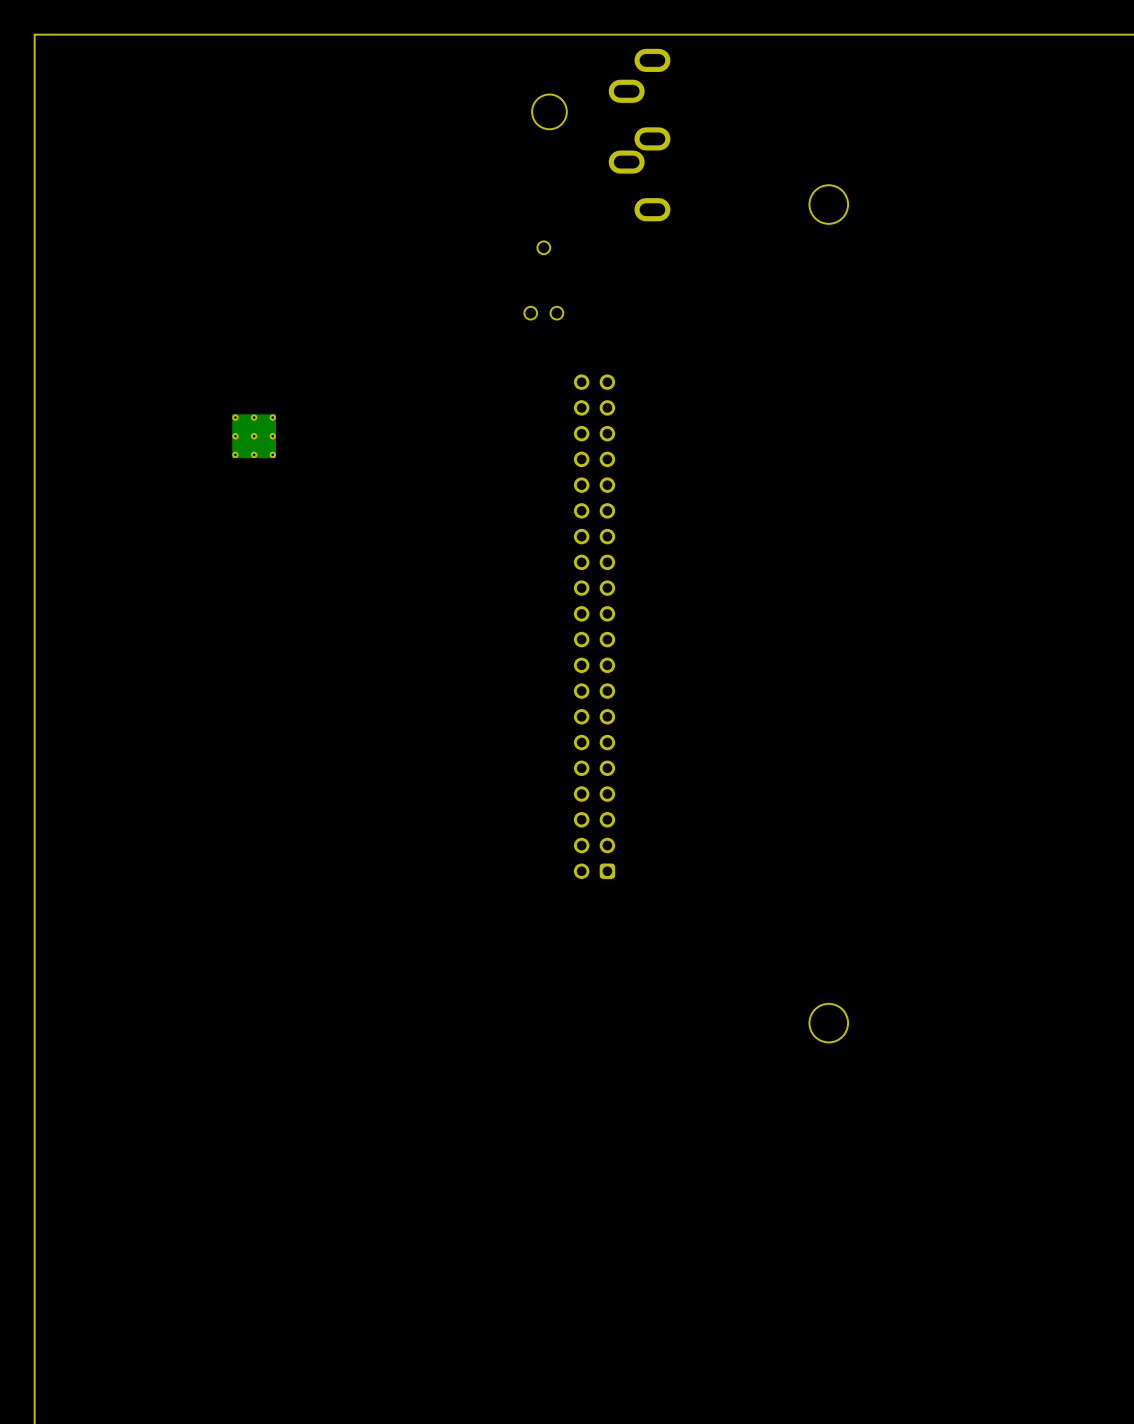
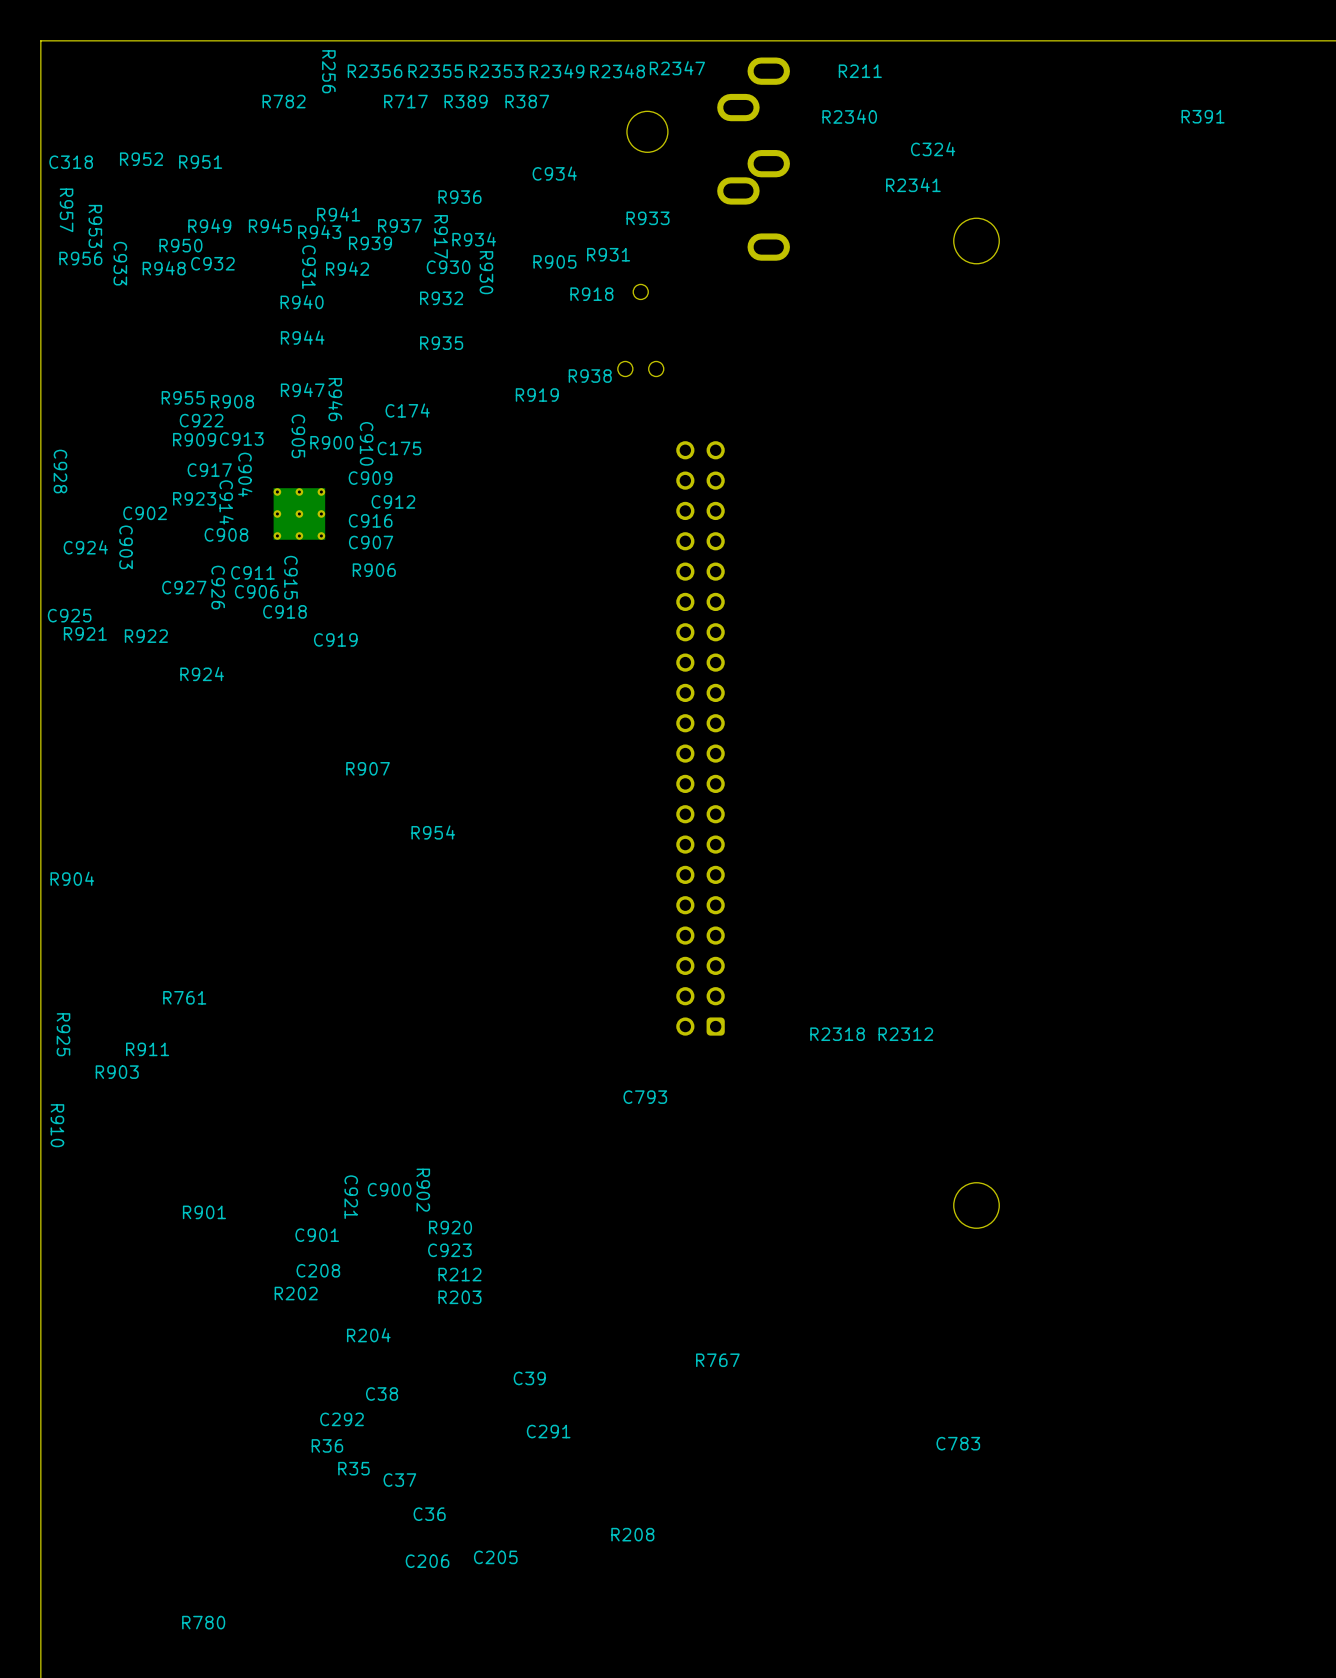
R2347: none -> (677, 68)
R256: none -> (328, 71)
R2356: none -> (375, 71)
R2355: none -> (435, 71)
R2353: none -> (496, 71)
R2349: none -> (557, 71)
R2348: none -> (617, 71)
R211: none -> (860, 71)
R782: none -> (284, 101)
R717: none -> (405, 101)
R389: none -> (466, 101)
R387: none -> (527, 101)
R2340: none -> (849, 116)
R391: none -> (1203, 116)
C324: none -> (933, 149)
R952: none -> (141, 159)
C318: none -> (71, 162)
R951: none -> (200, 162)
C934: none -> (554, 173)
R2341: none -> (913, 185)
R936: none -> (459, 197)
R957: none -> (66, 210)
R941: none -> (338, 214)
R933: none -> (648, 218)
R949: none -> (209, 225)
R945: none -> (270, 225)
R937: none -> (399, 225)
R953: none -> (95, 226)
R943: none -> (319, 231)
R917: none -> (441, 236)
R934: none -> (474, 239)
R939: none -> (370, 243)
R950: none -> (180, 245)
R931: none -> (608, 254)
R956: none -> (80, 258)
R905: none -> (554, 261)
C933: none -> (120, 263)
C932: none -> (212, 263)
C931: none -> (308, 267)
C930: none -> (448, 267)
R948: none -> (164, 268)
R942: none -> (347, 268)
R930: none -> (486, 272)
R918: none -> (591, 294)
R932: none -> (441, 298)
R940: none -> (302, 302)
R944: none -> (302, 337)
R935: none -> (441, 343)
R938: none -> (590, 376)
R947: none -> (302, 390)
R919: none -> (537, 395)
R955: none -> (183, 397)
R946: none -> (335, 399)
R908: none -> (232, 401)
C174: none -> (407, 410)
C922: none -> (201, 420)
C905: none -> (298, 436)
C913: none -> (241, 438)
R909: none -> (194, 439)
R900: none -> (331, 442)
C910: none -> (366, 443)
C175: none -> (399, 448)
C917: none -> (209, 470)
C928: none -> (60, 471)
C904: none -> (245, 474)
C909: none -> (370, 478)
R923: none -> (194, 498)
C912: none -> (393, 501)
C914: none -> (226, 502)
C902: none -> (145, 513)
C916: none -> (370, 520)
C908: none -> (226, 534)
C907: none -> (371, 542)
C924: none -> (85, 547)
C903: none -> (126, 547)
R906: none -> (374, 570)
C911: none -> (252, 572)
C915: none -> (290, 577)
C927: none -> (184, 587)
C926: none -> (218, 587)
C906: none -> (256, 591)
C918: none -> (284, 611)
C925: none -> (69, 615)
R921: none -> (85, 633)
R922: none -> (146, 636)
C919: none -> (335, 639)
R924: none -> (202, 674)
R907: none -> (368, 768)
R954: none -> (433, 832)
R904: none -> (72, 878)
R761: none -> (184, 997)
R2318: none -> (837, 1034)
R2312: none -> (905, 1034)
R925: none -> (63, 1034)
R911: none -> (147, 1049)
R903: none -> (117, 1072)
C793: none -> (645, 1097)
R910: none -> (57, 1125)
C900: none -> (389, 1189)
R902: none -> (423, 1190)
C921: none -> (351, 1197)
R901: none -> (204, 1212)
R920: none -> (450, 1227)
C901: none -> (317, 1235)
C923: none -> (449, 1250)
C208: none -> (318, 1270)
R212: none -> (459, 1274)
R202: none -> (296, 1293)
R203: none -> (459, 1297)
R204: none -> (368, 1335)
R767: none -> (717, 1360)
C39: none -> (529, 1378)
C38: none -> (382, 1394)
C292: none -> (342, 1419)
C291: none -> (548, 1431)
C783: none -> (958, 1443)
R36: none -> (327, 1445)
R35: none -> (353, 1468)
C37: none -> (399, 1480)
C36: none -> (429, 1514)
R208: none -> (632, 1534)
C205: none -> (495, 1557)
C206: none -> (427, 1561)
R780: none -> (203, 1622)

